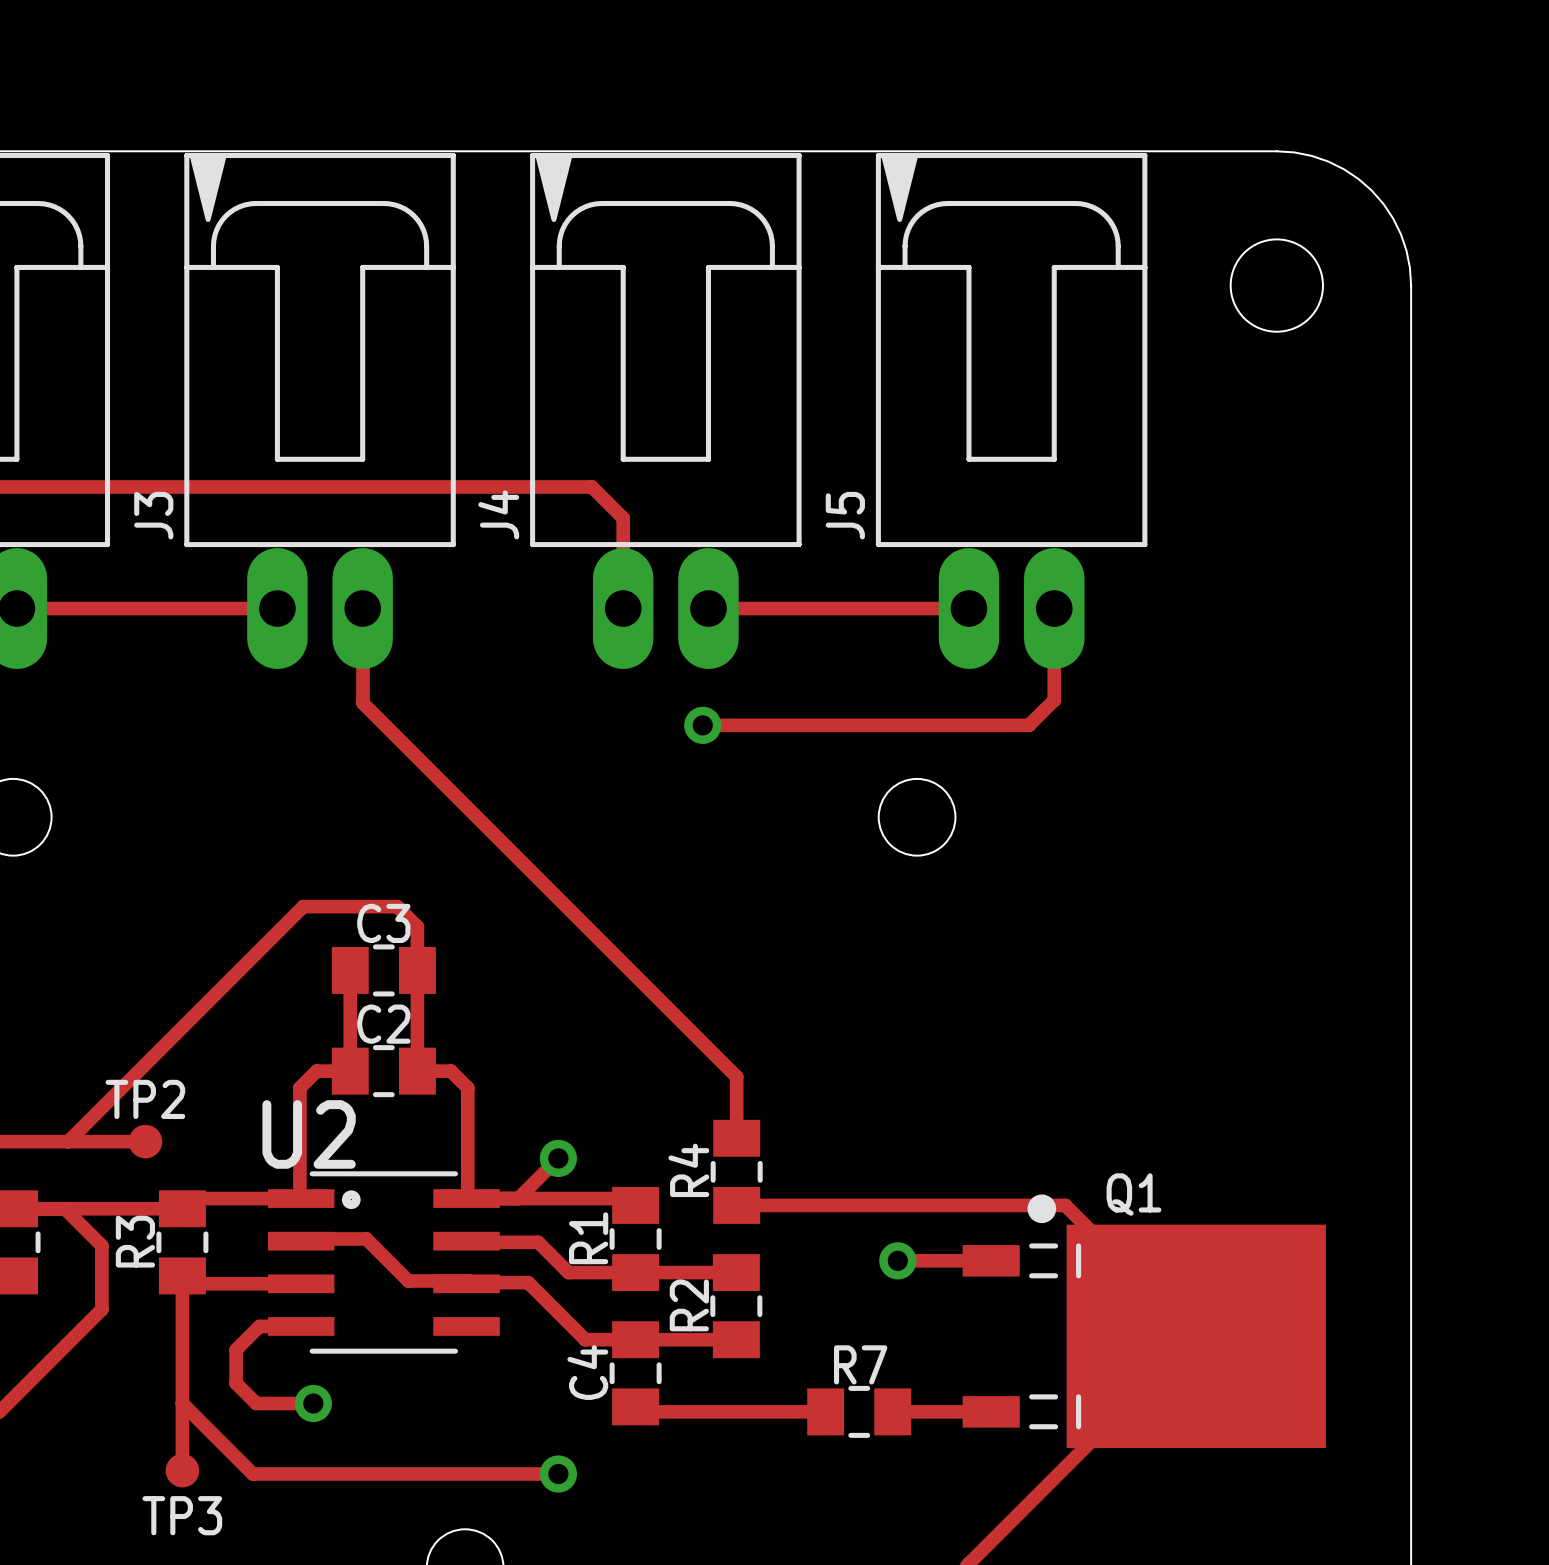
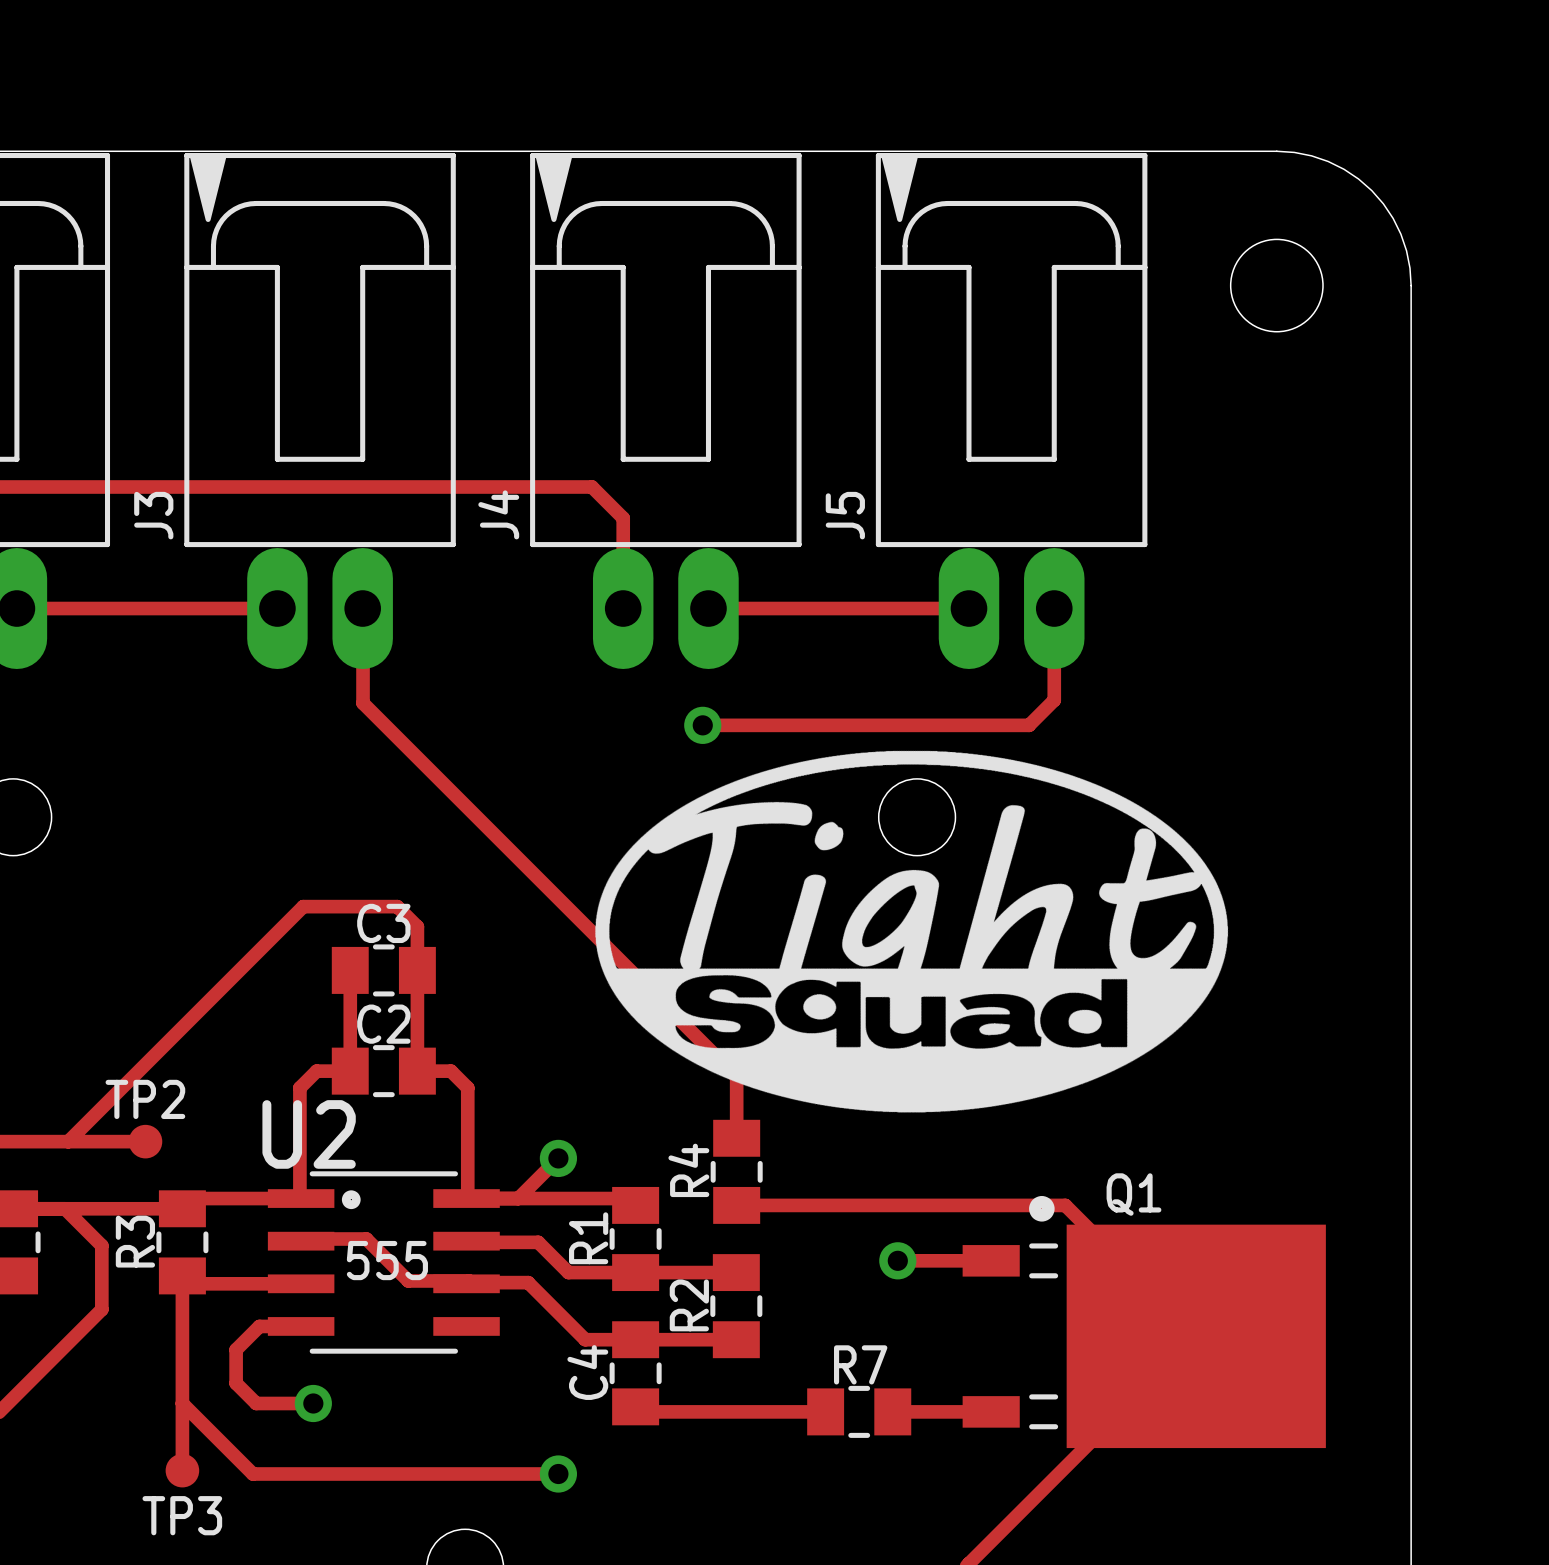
drawing: none -> [595, 750, 1229, 1113]
Q1 footprint: [962, 1194, 1326, 1449] -> [962, 1195, 1326, 1449]
text: none -> 555 (387, 1260)

